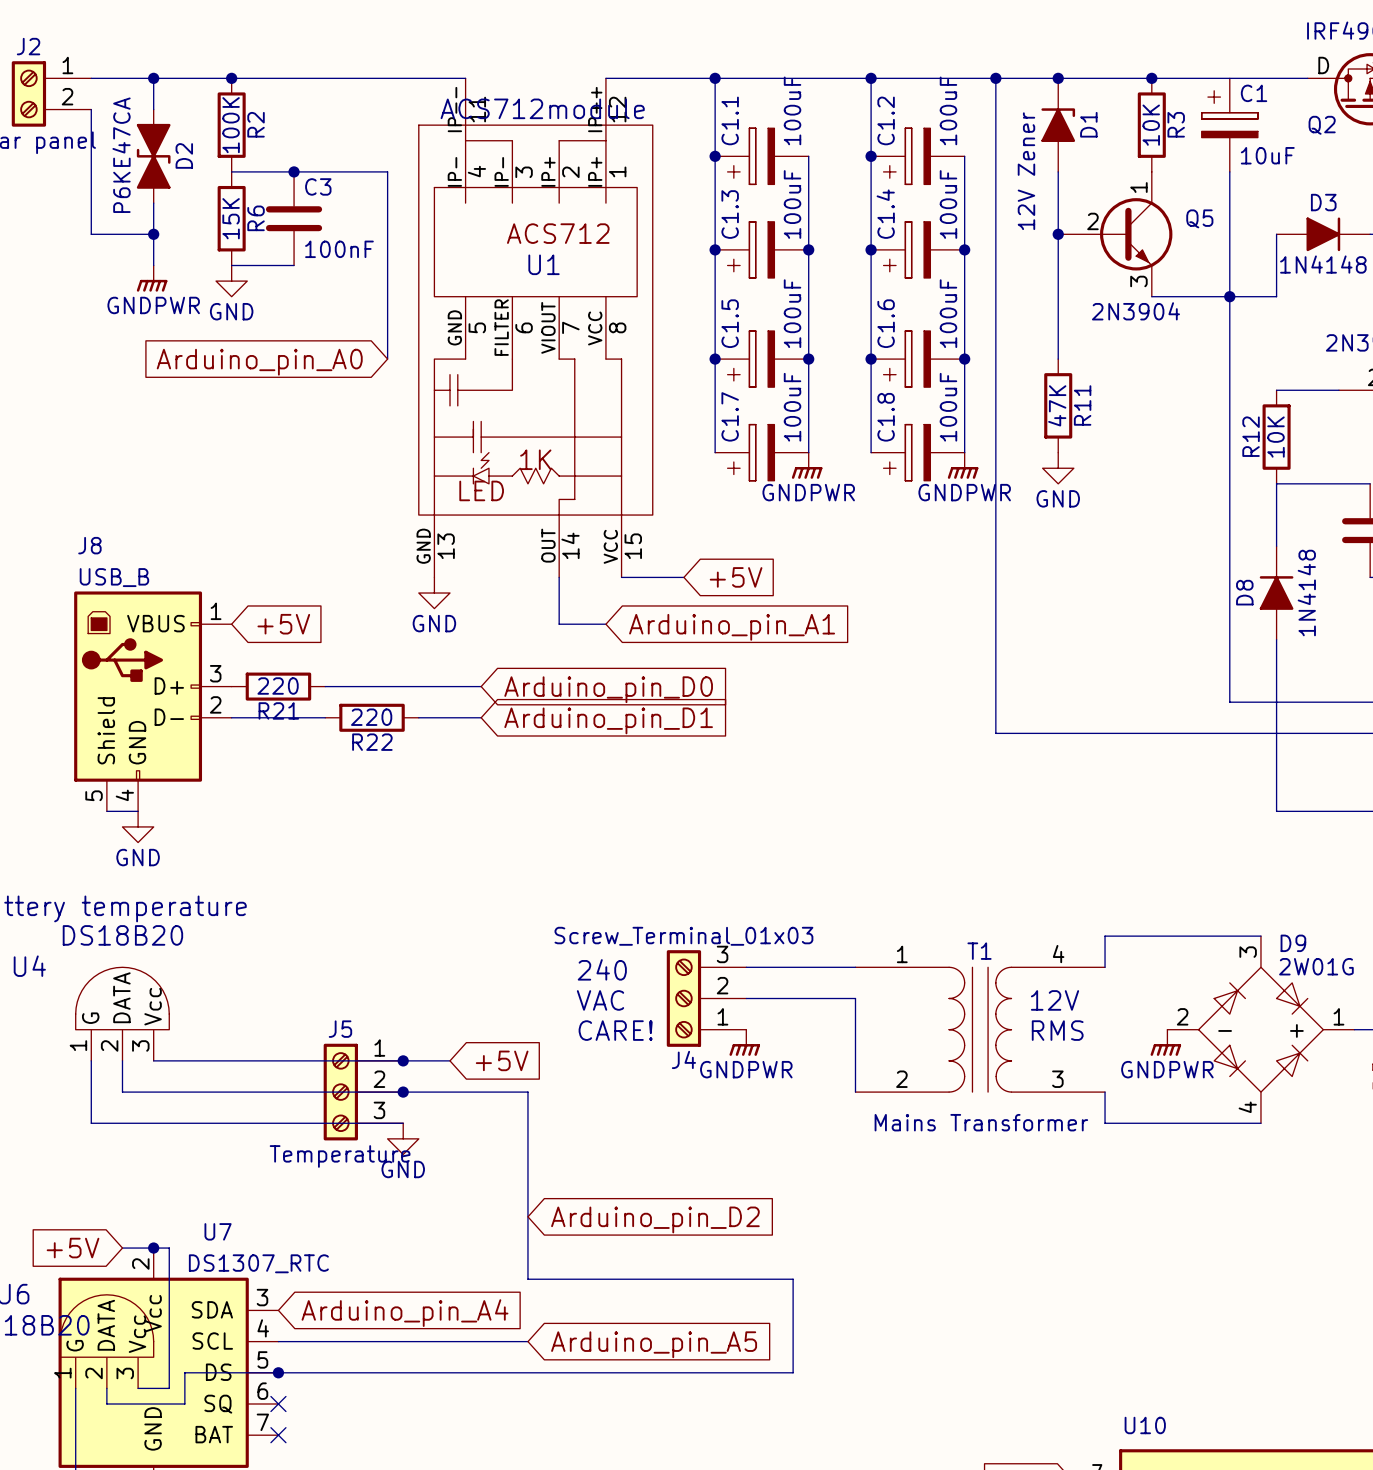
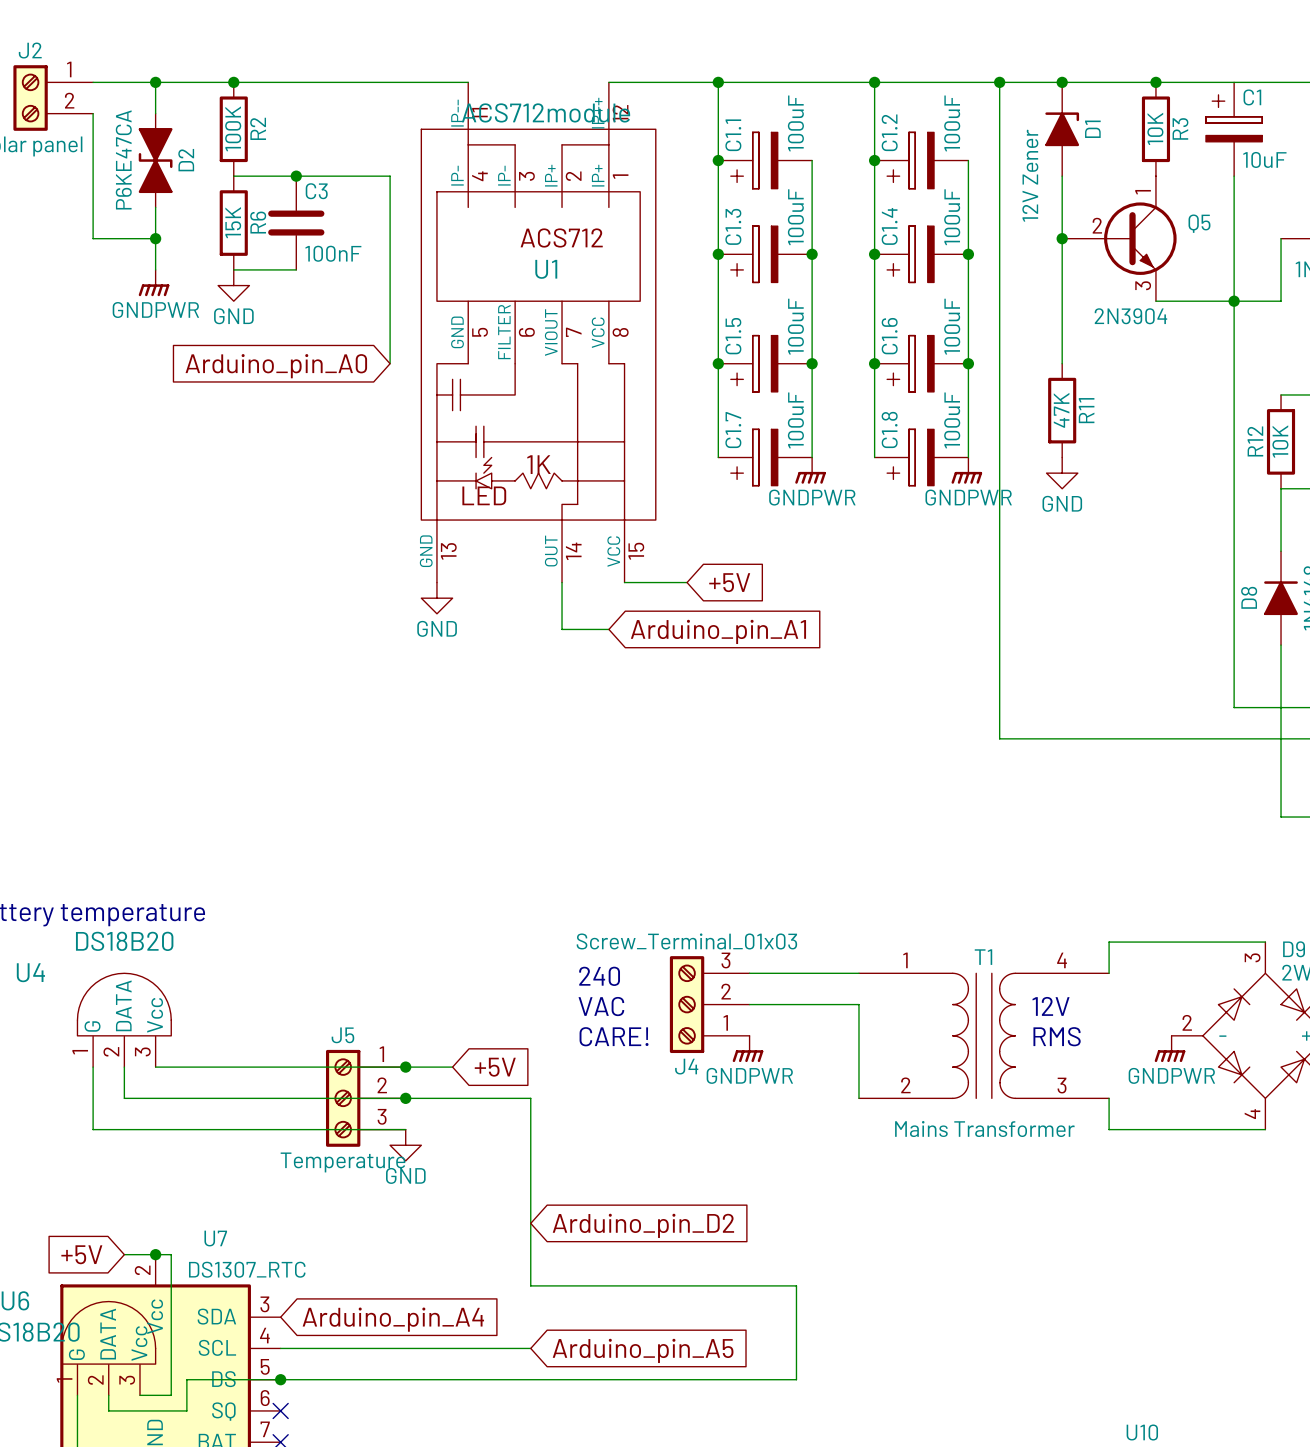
global label: +5V (283, 624) -> none
R21: 220 (278, 686) -> none
wire: (325, 686) (481, 686) -> none
global label: Arduino_pin_D0 (608, 689) -> none
J8: USB_B (152, 701) -> none
wire: (231, 717) (325, 717) -> none
R22: 220 (372, 717) -> none
wire: (418, 717) (481, 717) -> none
global label: Arduino_pin_D1 (608, 720) -> none
wire: (106, 811) (138, 811) -> none
power symbol: GND (138, 826) -> none

